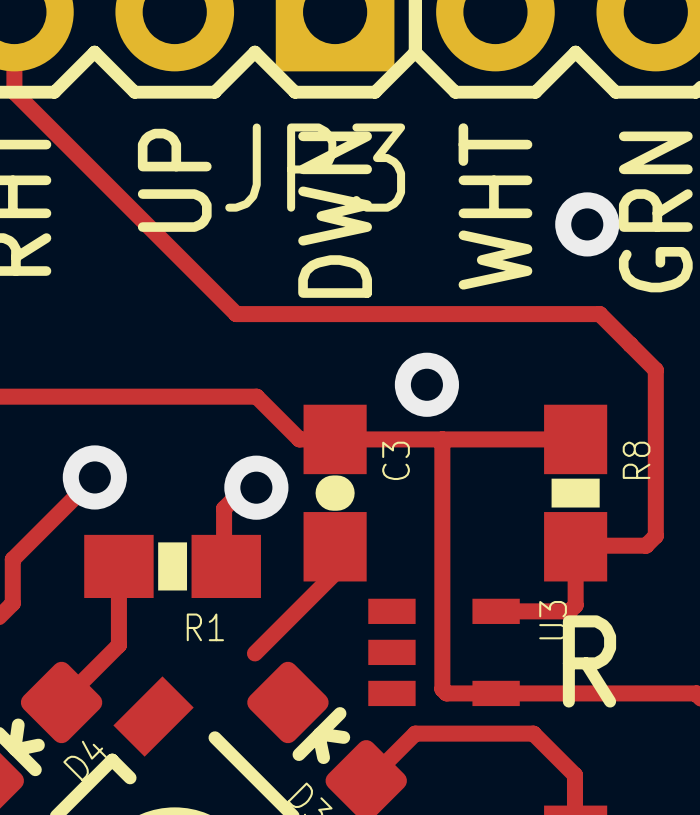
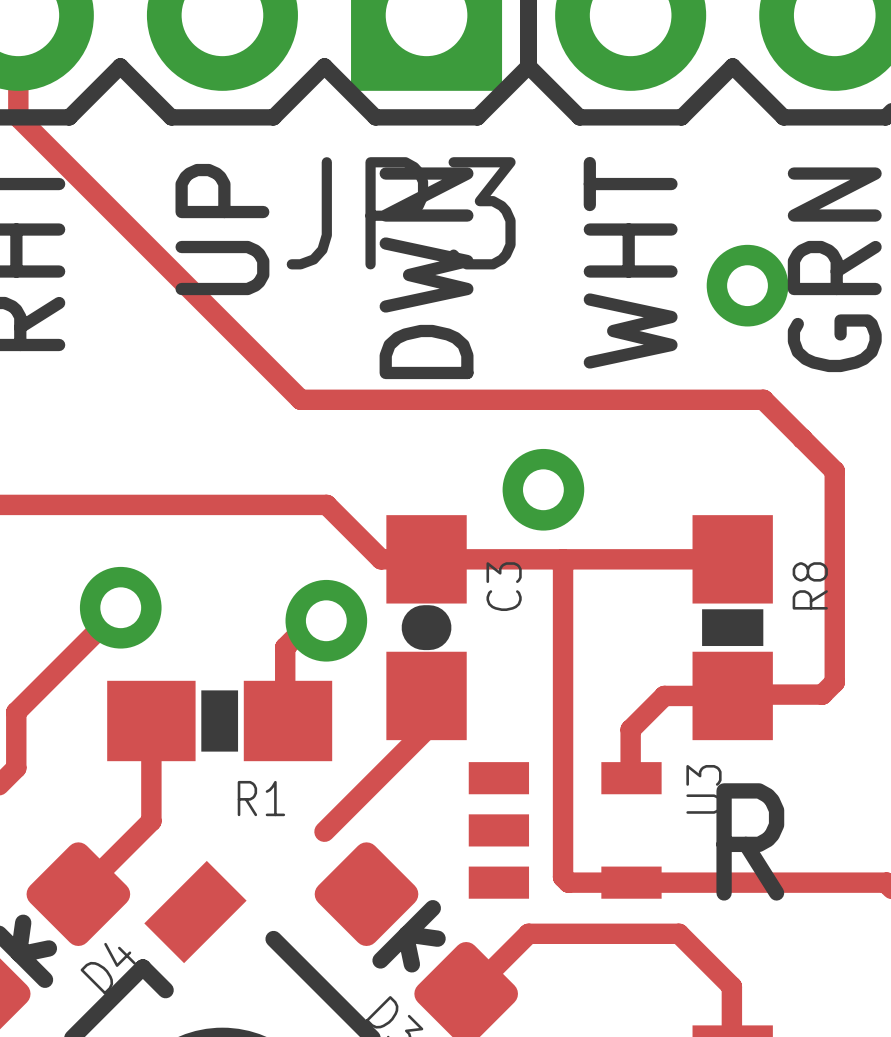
track: (575, 546) (575, 605) (569, 611) (496, 611) -> (732, 695) (664, 695) (630, 729) (630, 777)

